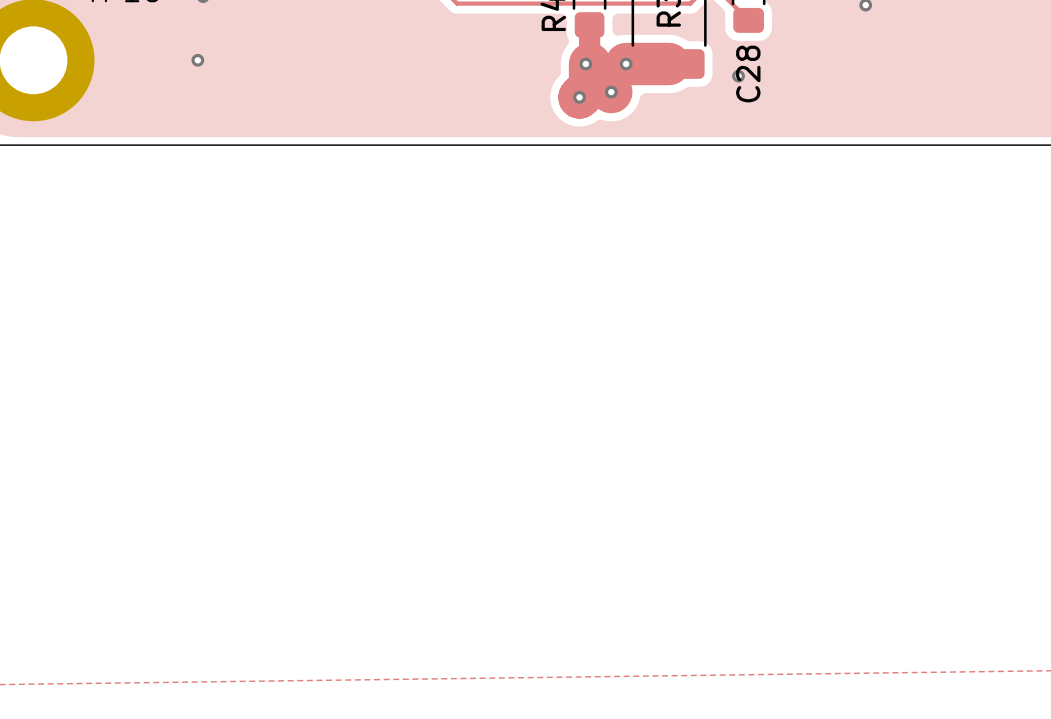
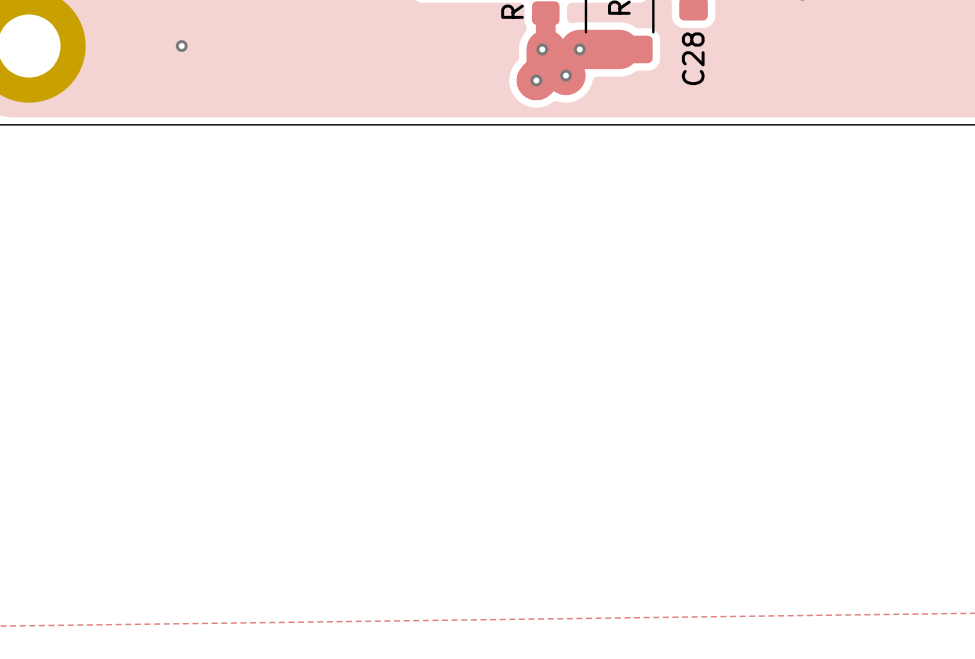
via: (738, 76) -> none

